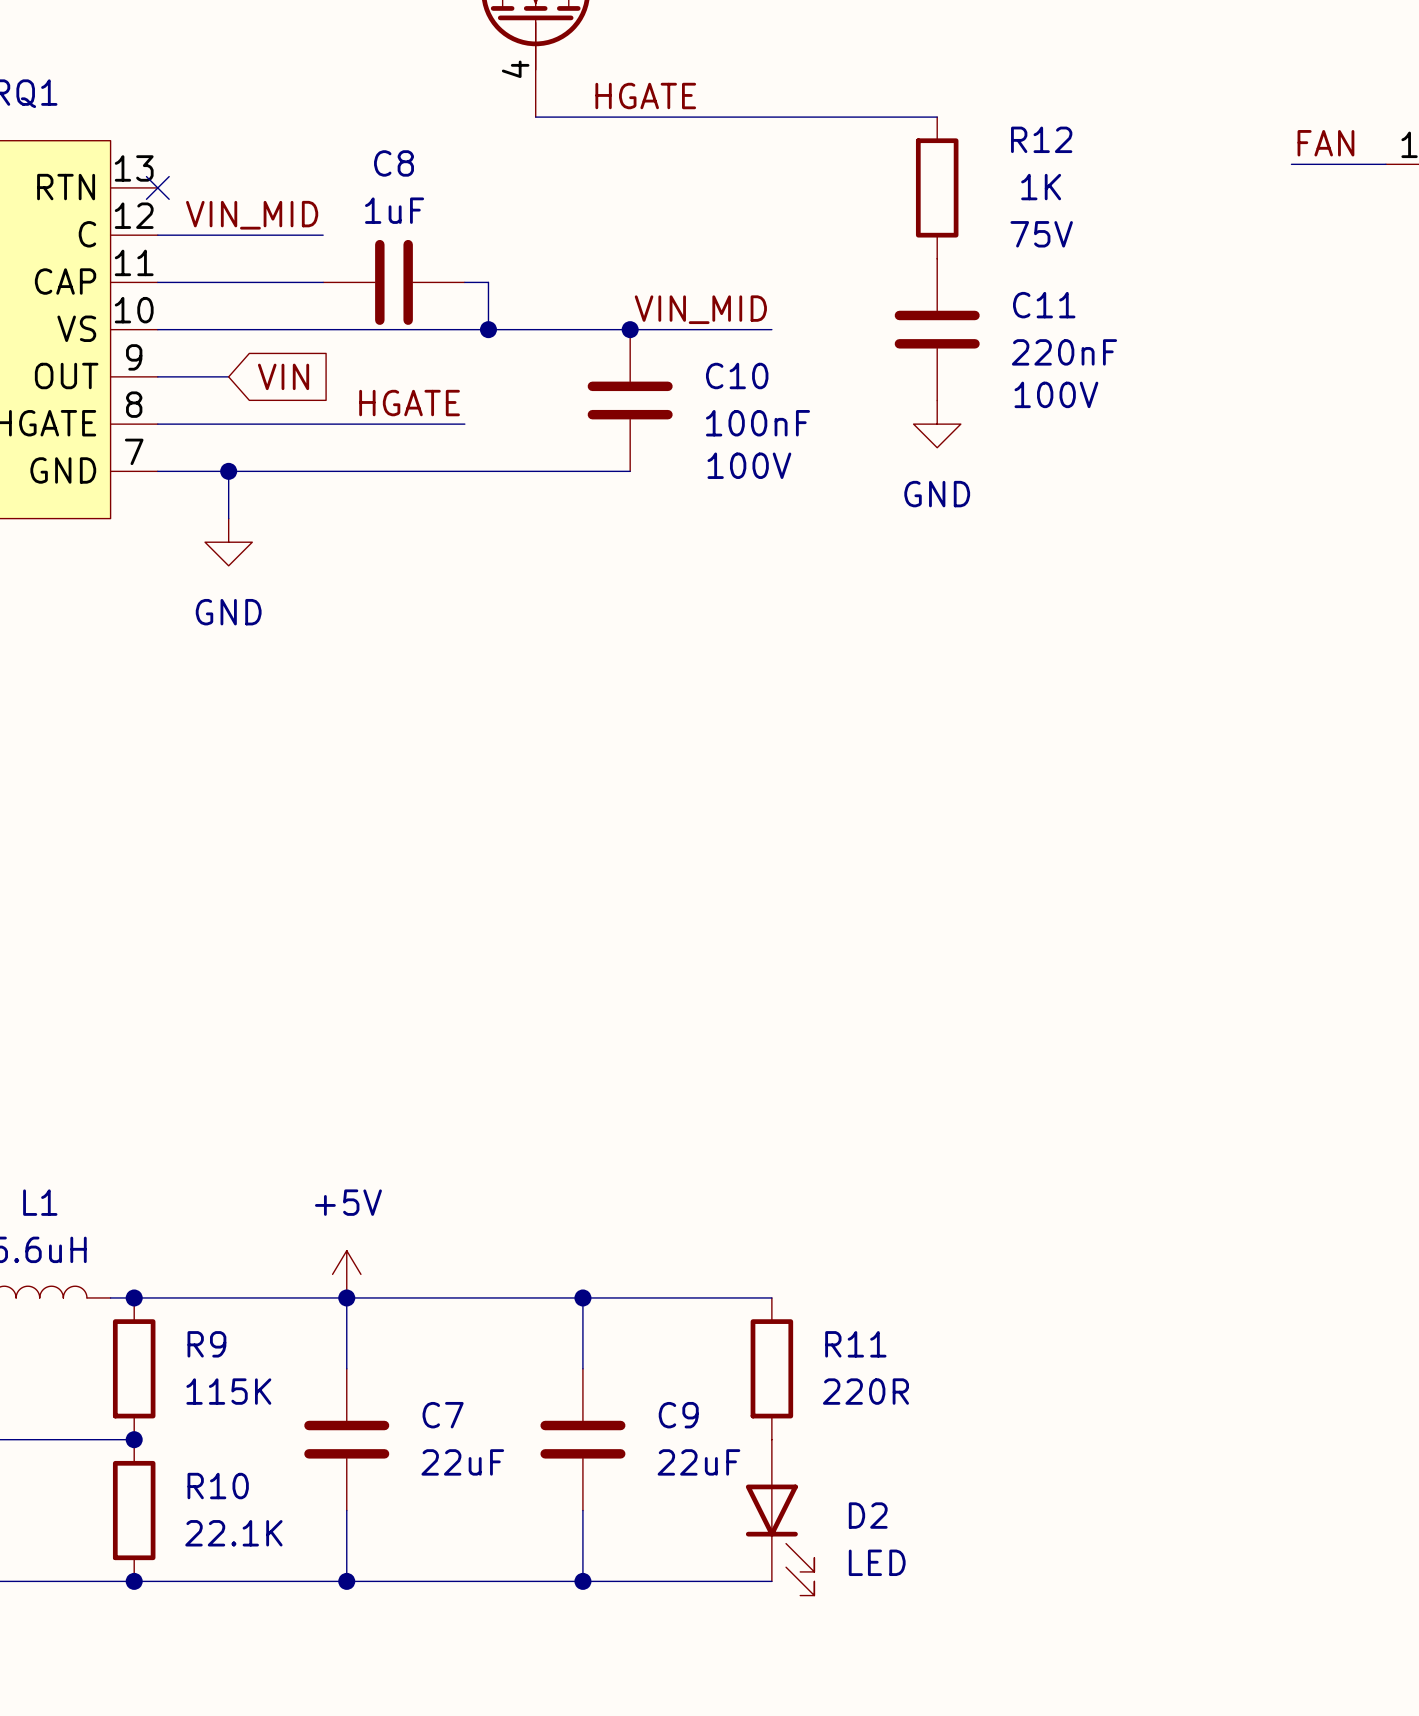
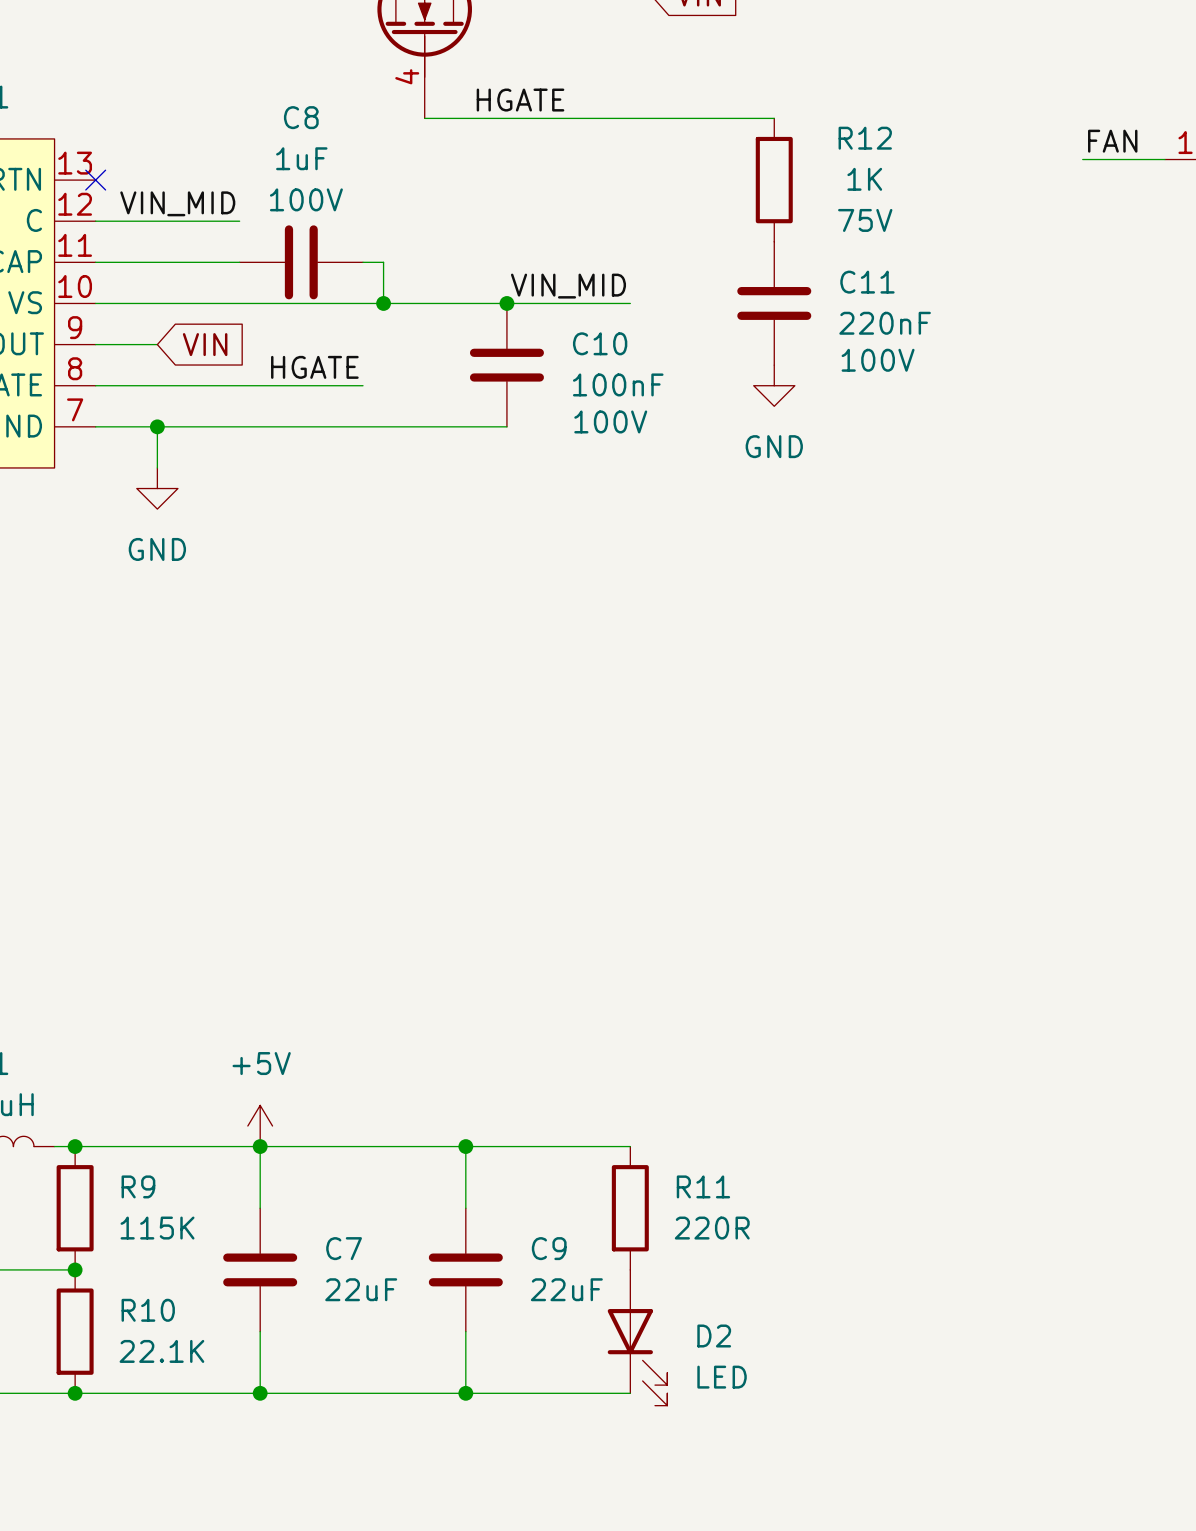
C8 name position: C8 (393, 163) -> C8 (301, 117)
C8 value position: 1uF (394, 210) -> 1uF (301, 158)
C8 text: none -> 100V (306, 199)

